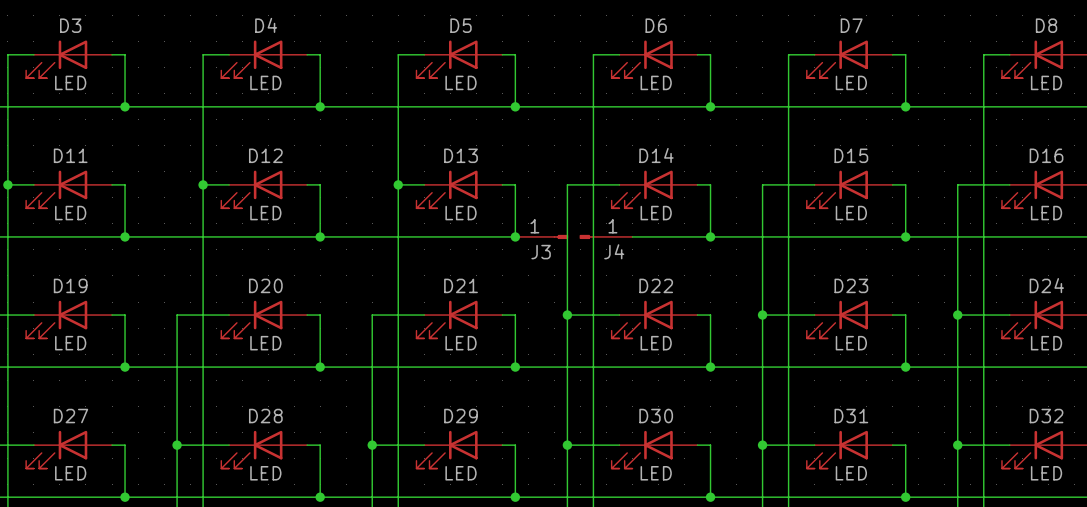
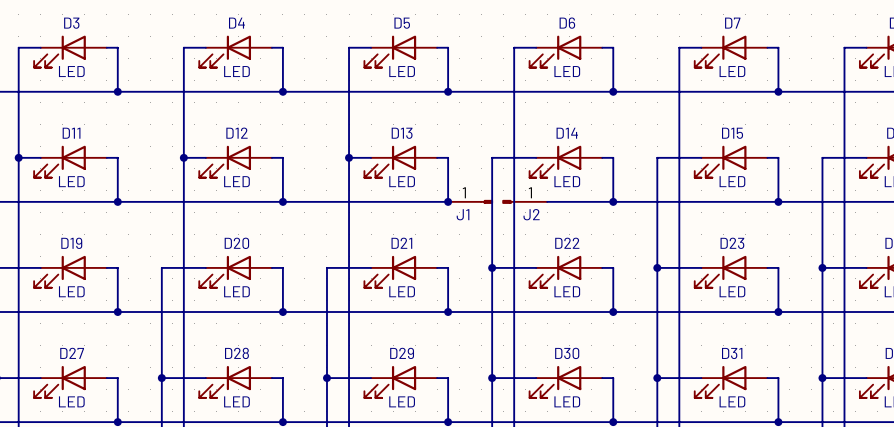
J4 name: J4 (614, 251) -> J2 (531, 214)
J3 name: J3 (541, 252) -> J1 (463, 214)

